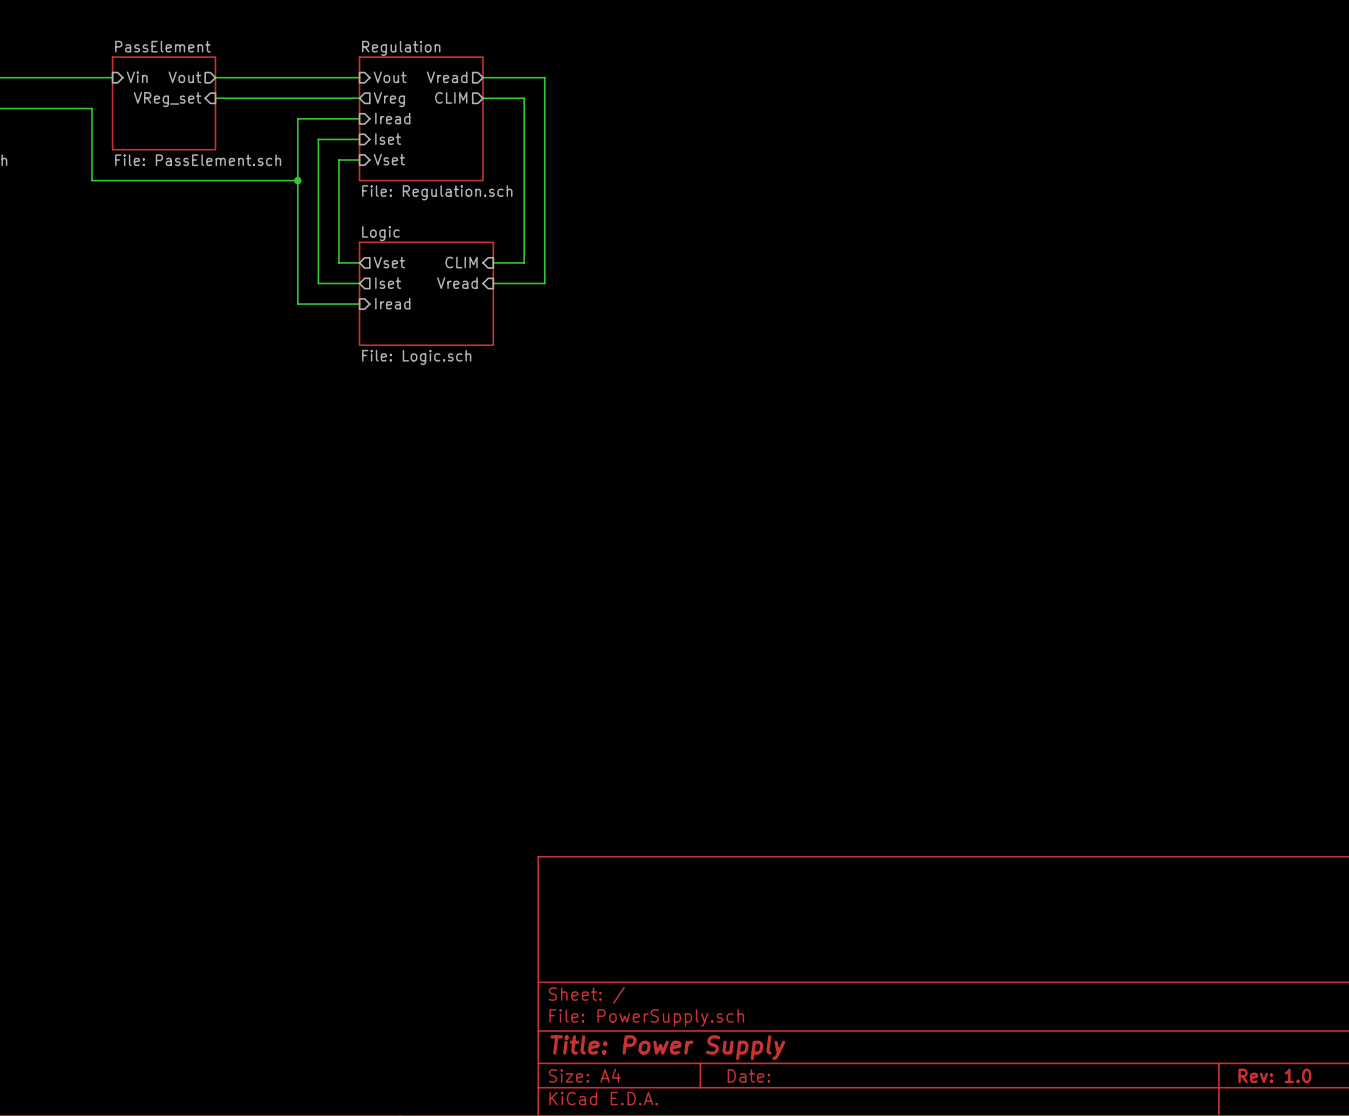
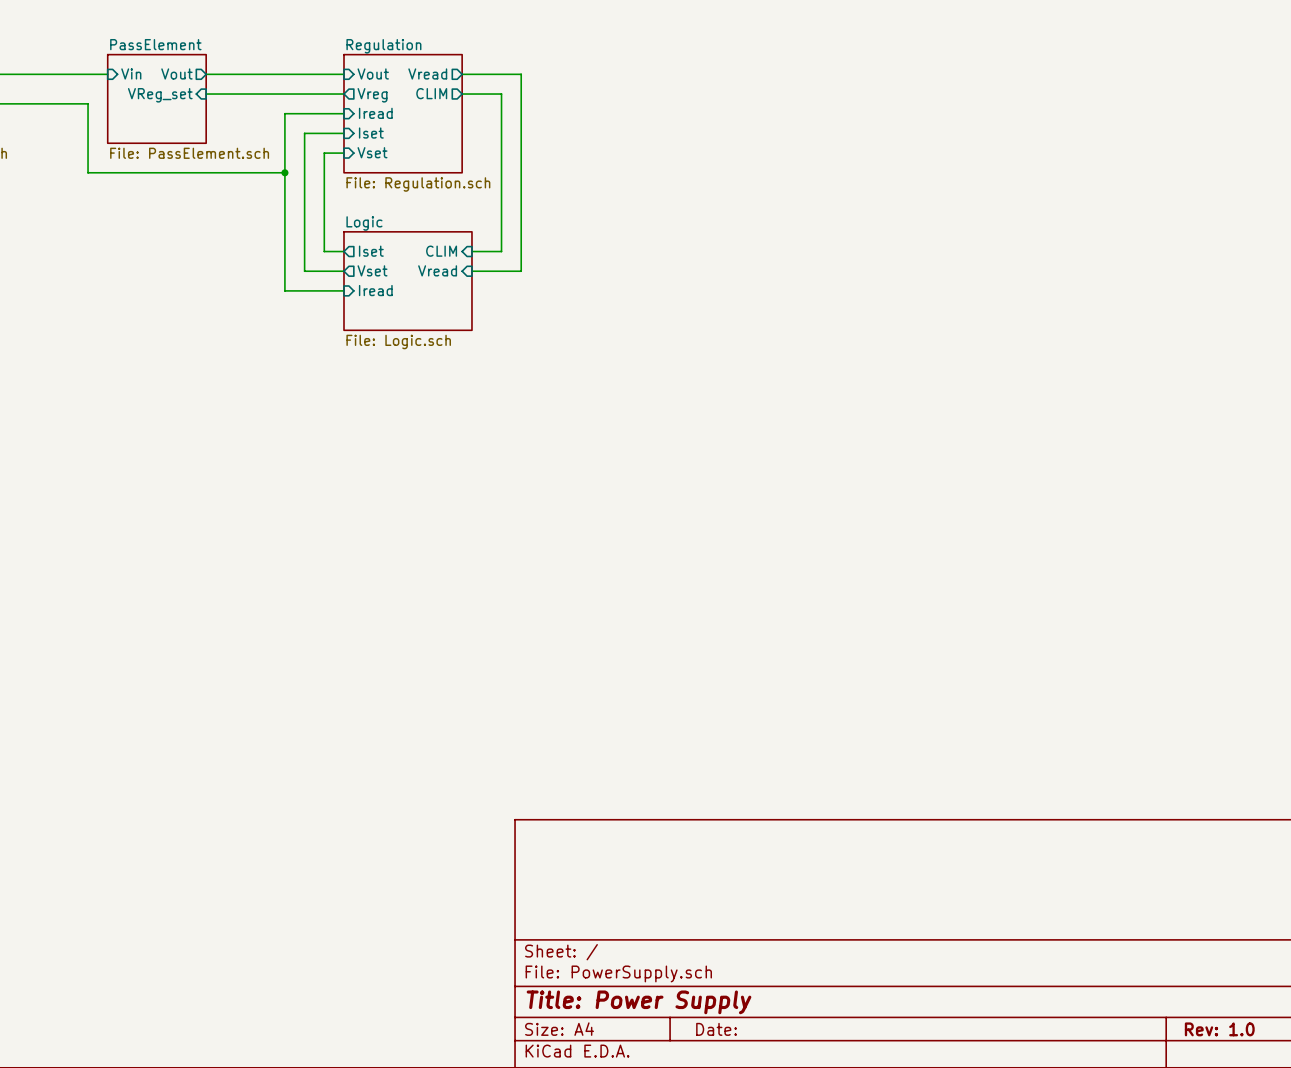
sheet pin: Vset (389, 262) -> Iset (371, 251)
sheet pin: Iset (388, 283) -> Vset (372, 270)

